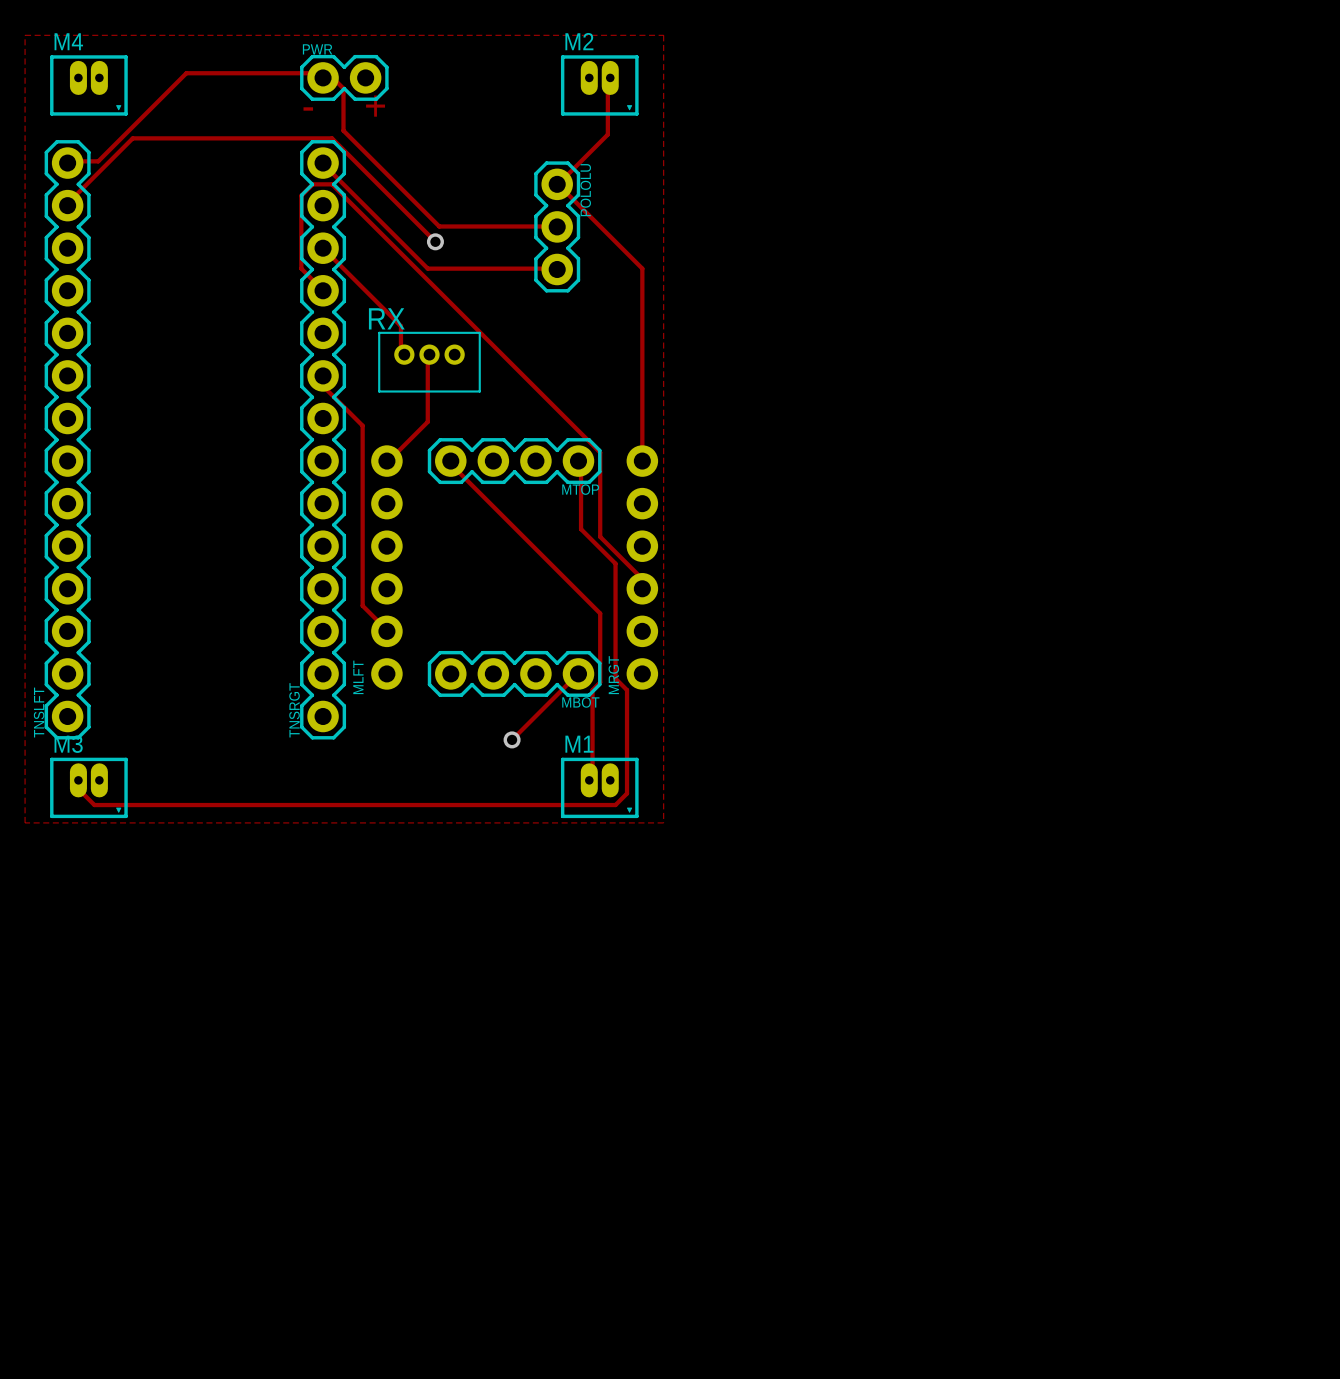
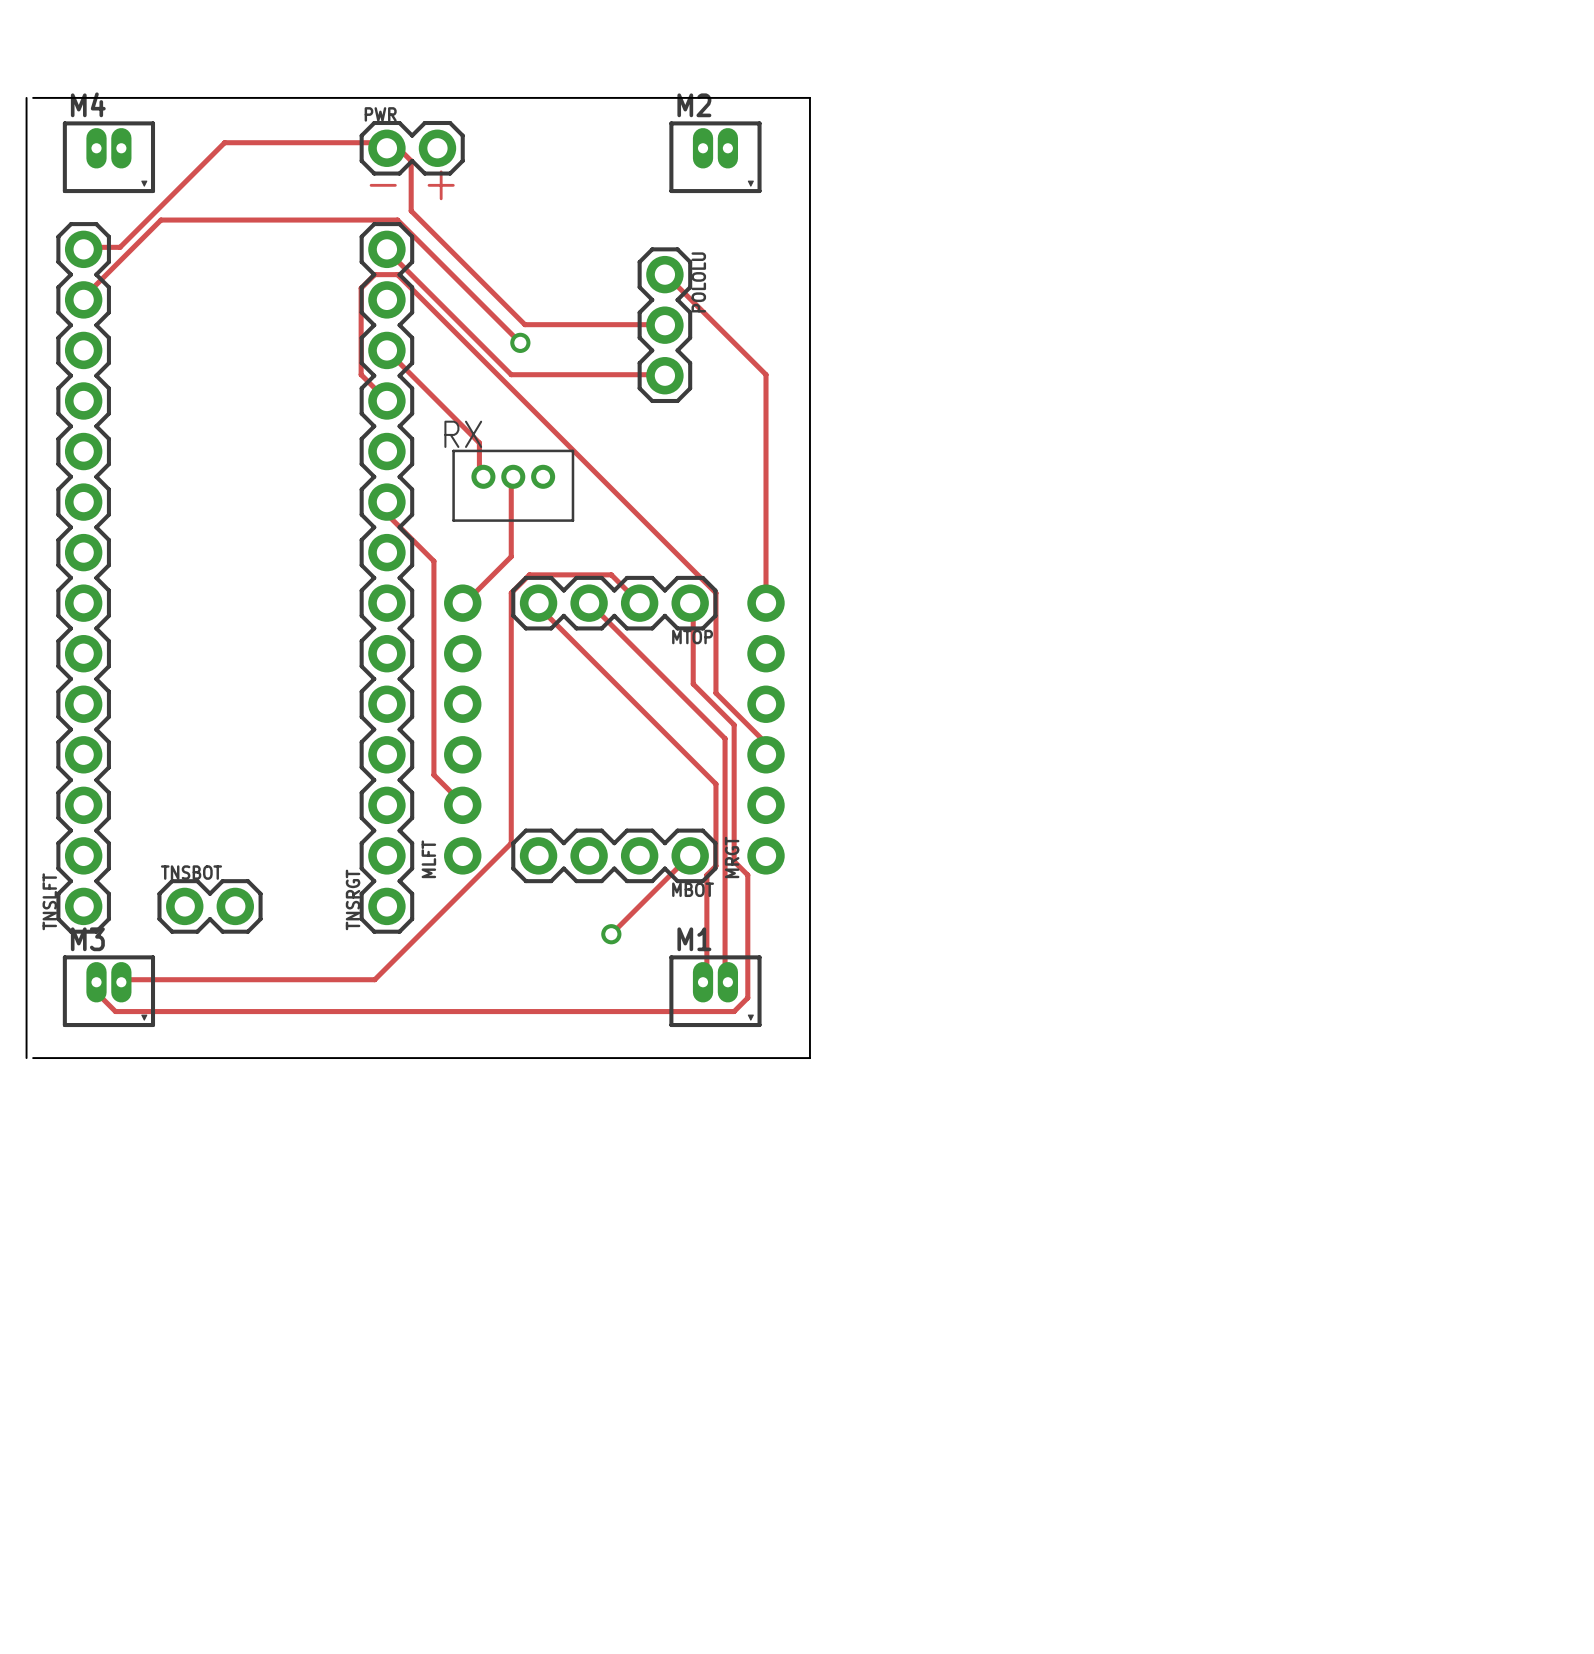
board edge: none -> (26, 97) (26, 1058)
zone outline: (25, 35) (663, 35) (663, 822) (25, 822) (25, 35) -> none
board edge: none -> (33, 97) (809, 97) (809, 1058) (33, 1058)
track: (610, 77) (607, 80) (607, 134) (558, 184) -> none
track: none -> (589, 603) (725, 738) (725, 979) (727, 982)
track: none -> (639, 603) (611, 574) (529, 574) (511, 593) (511, 843) (374, 979) (124, 979) (121, 982)
TNSBOT: none -> (210, 906)

